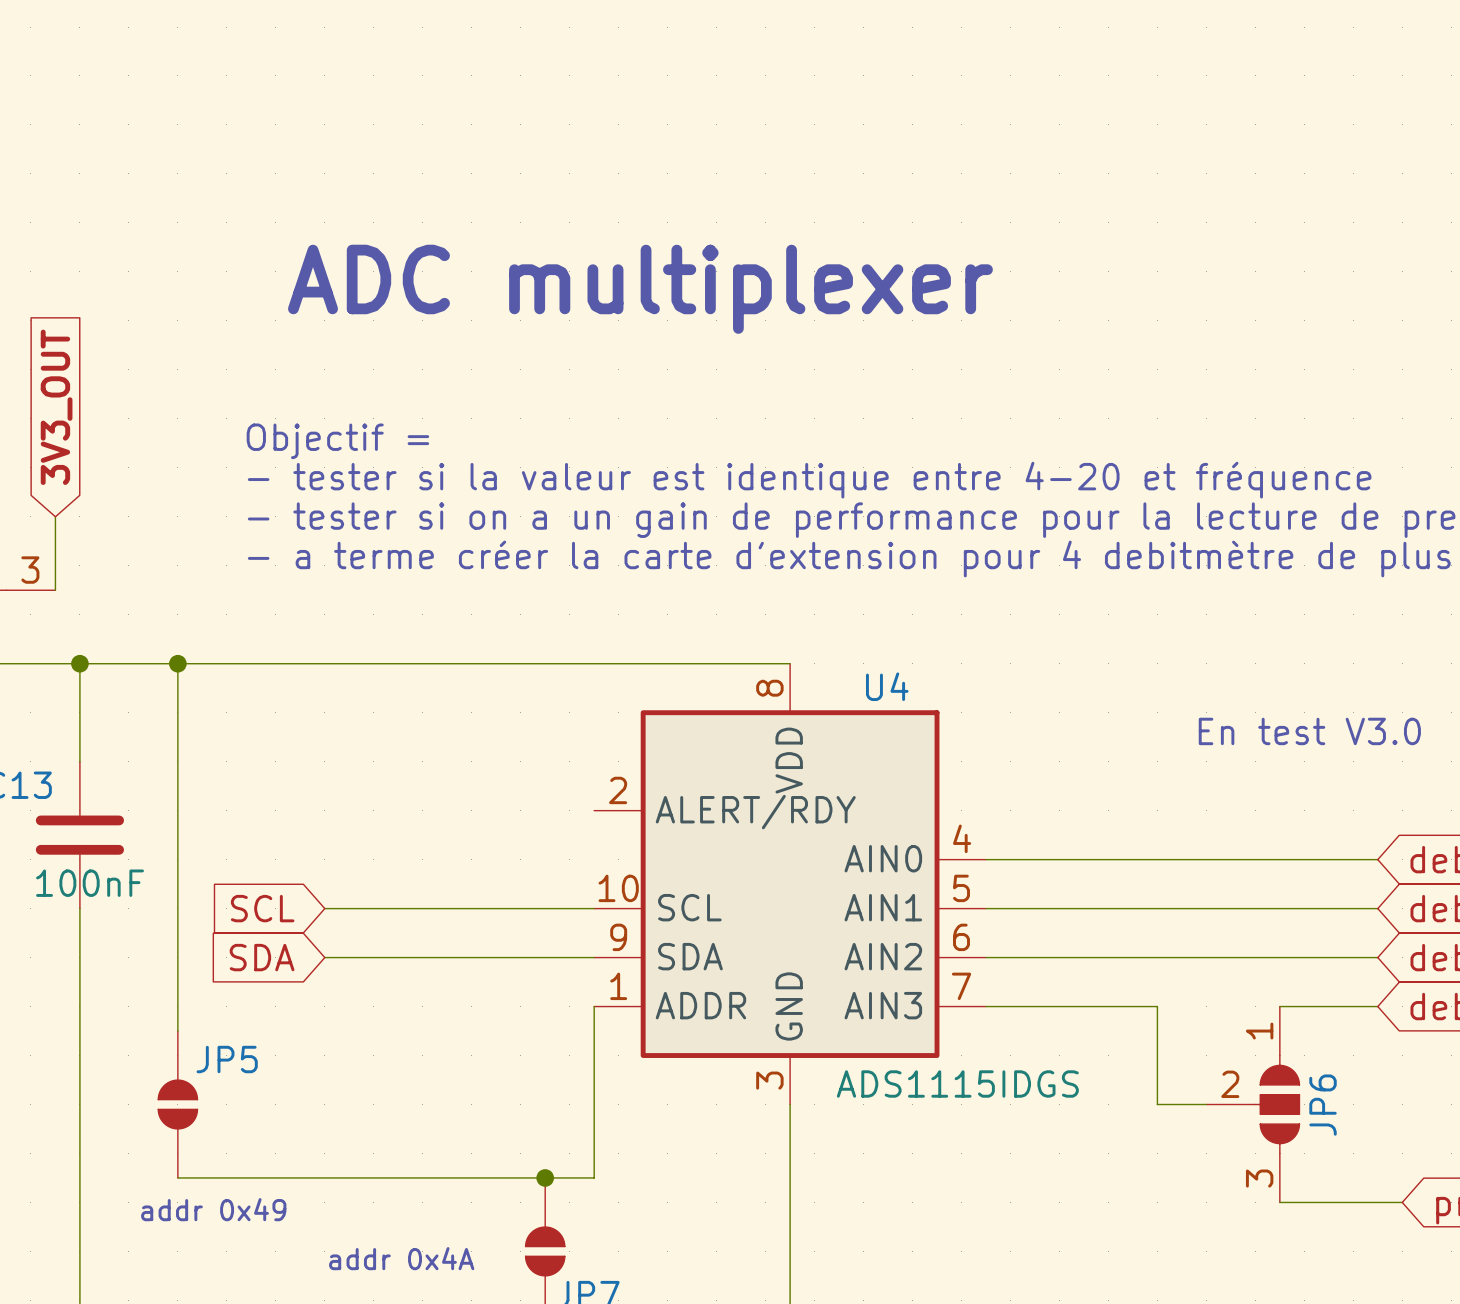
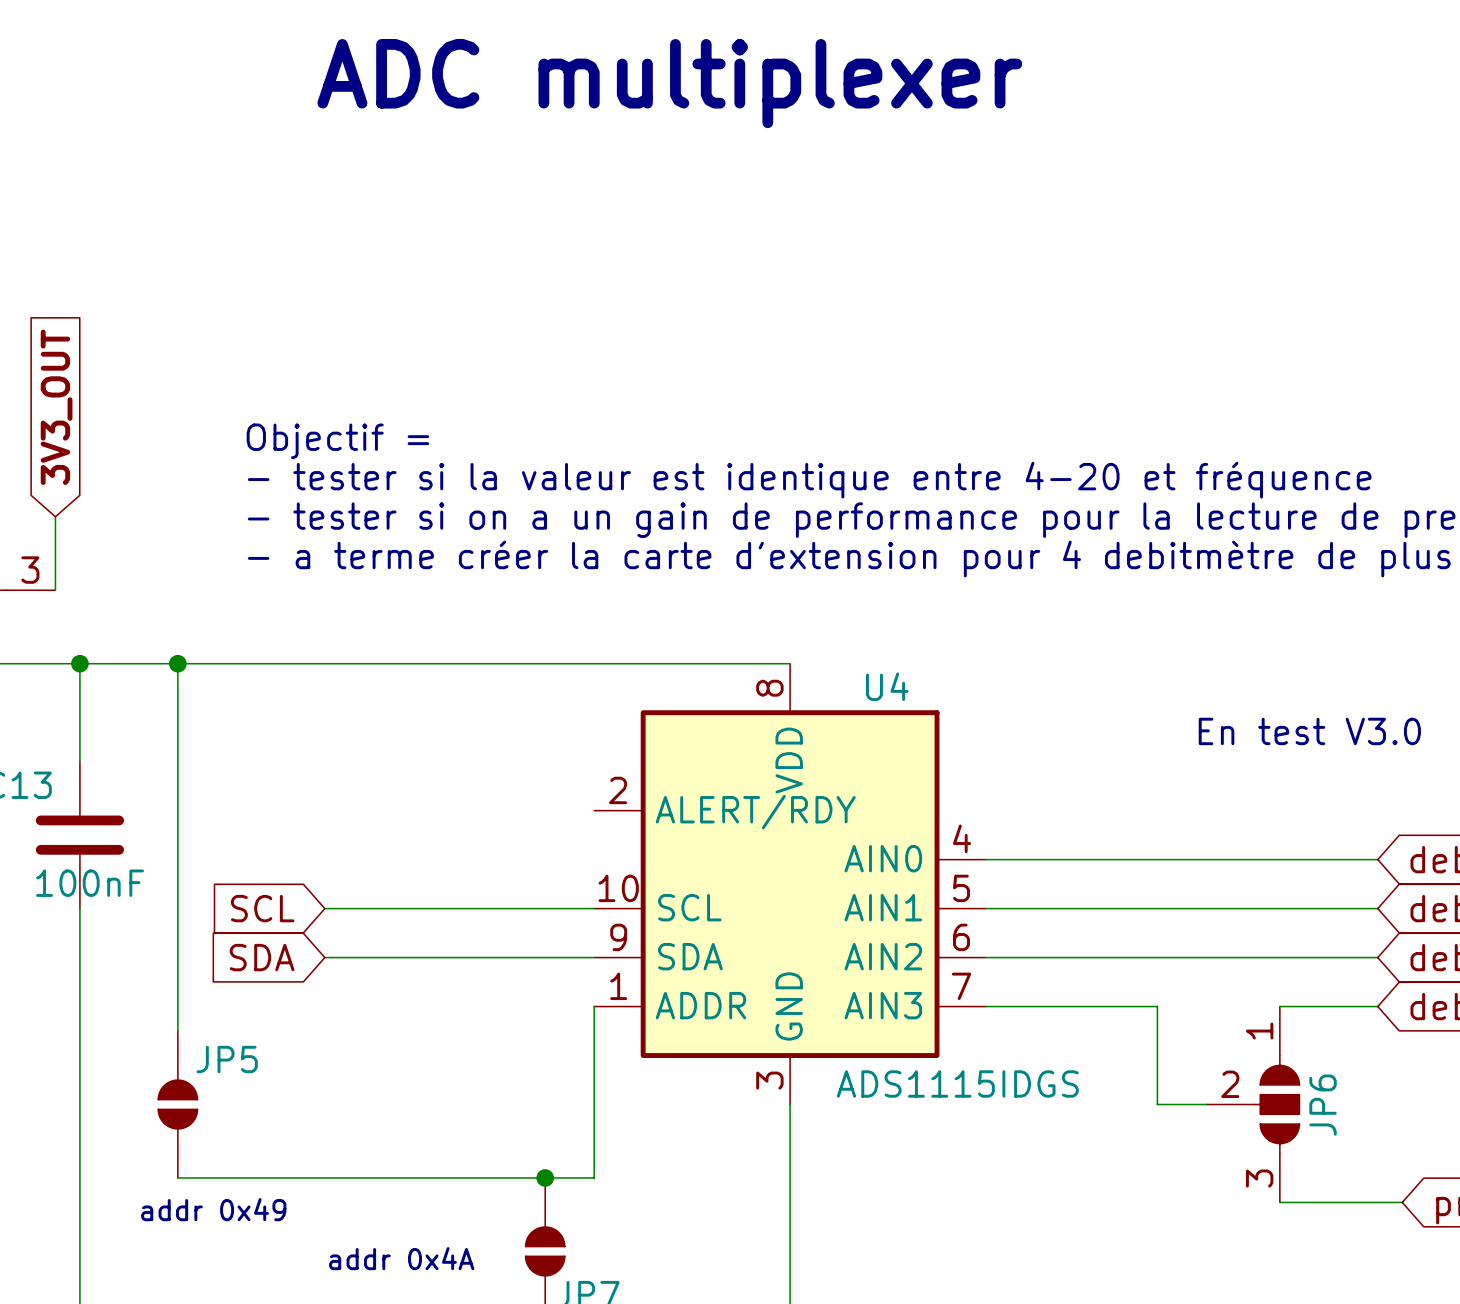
text position: ADC multiplexer (640, 289) -> ADC multiplexer (669, 83)

